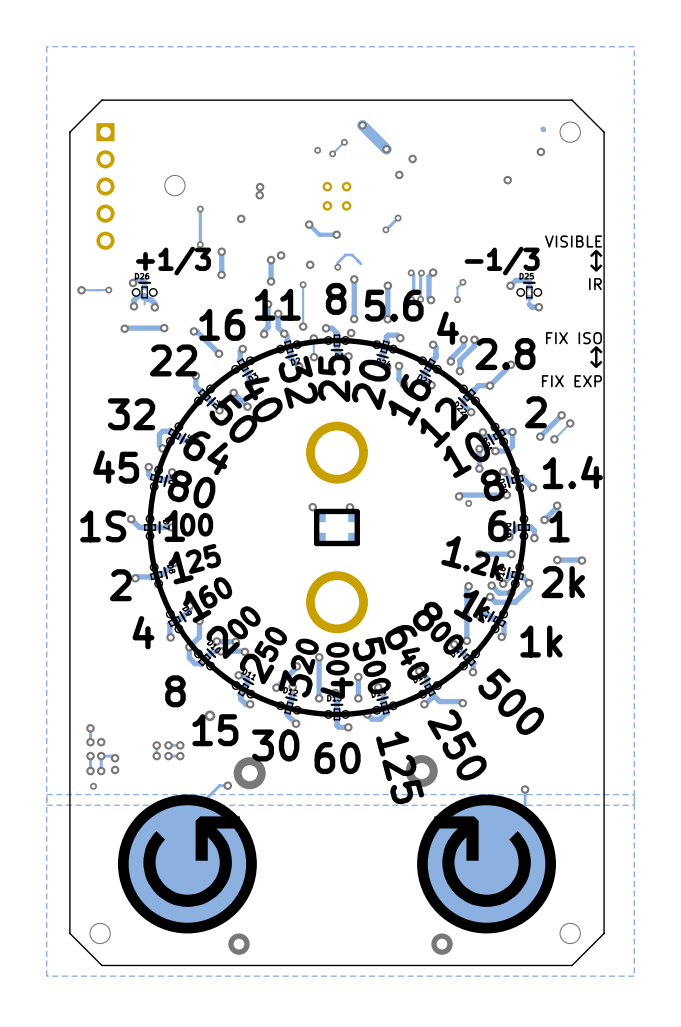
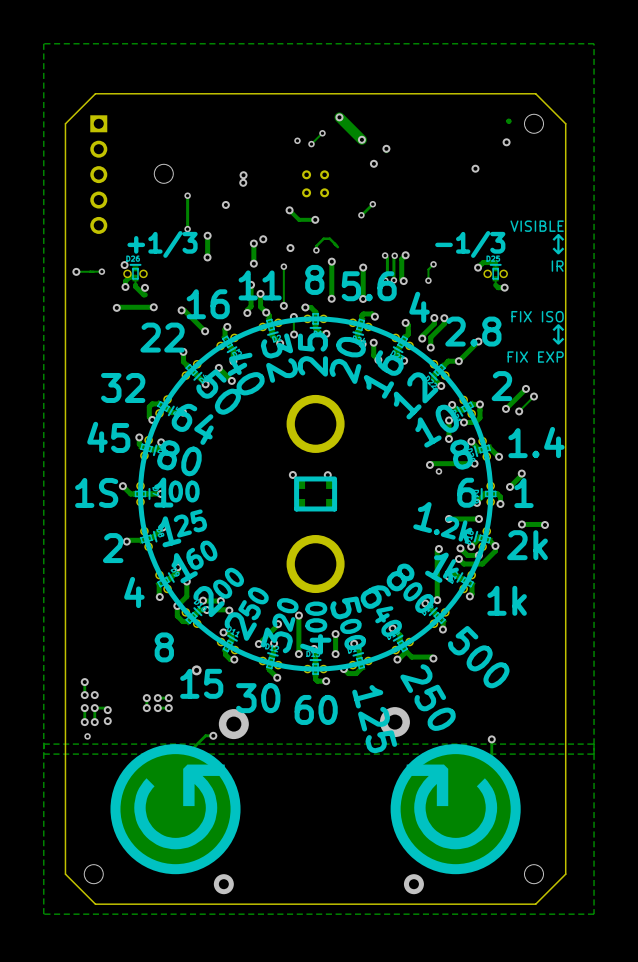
track: (133, 283) (135, 280) (144, 280) (144, 285) -> none
track: (144, 295) (154, 303) (154, 307) -> none
track: none -> (135, 285) (145, 294)
via: (351, 333) -> none

